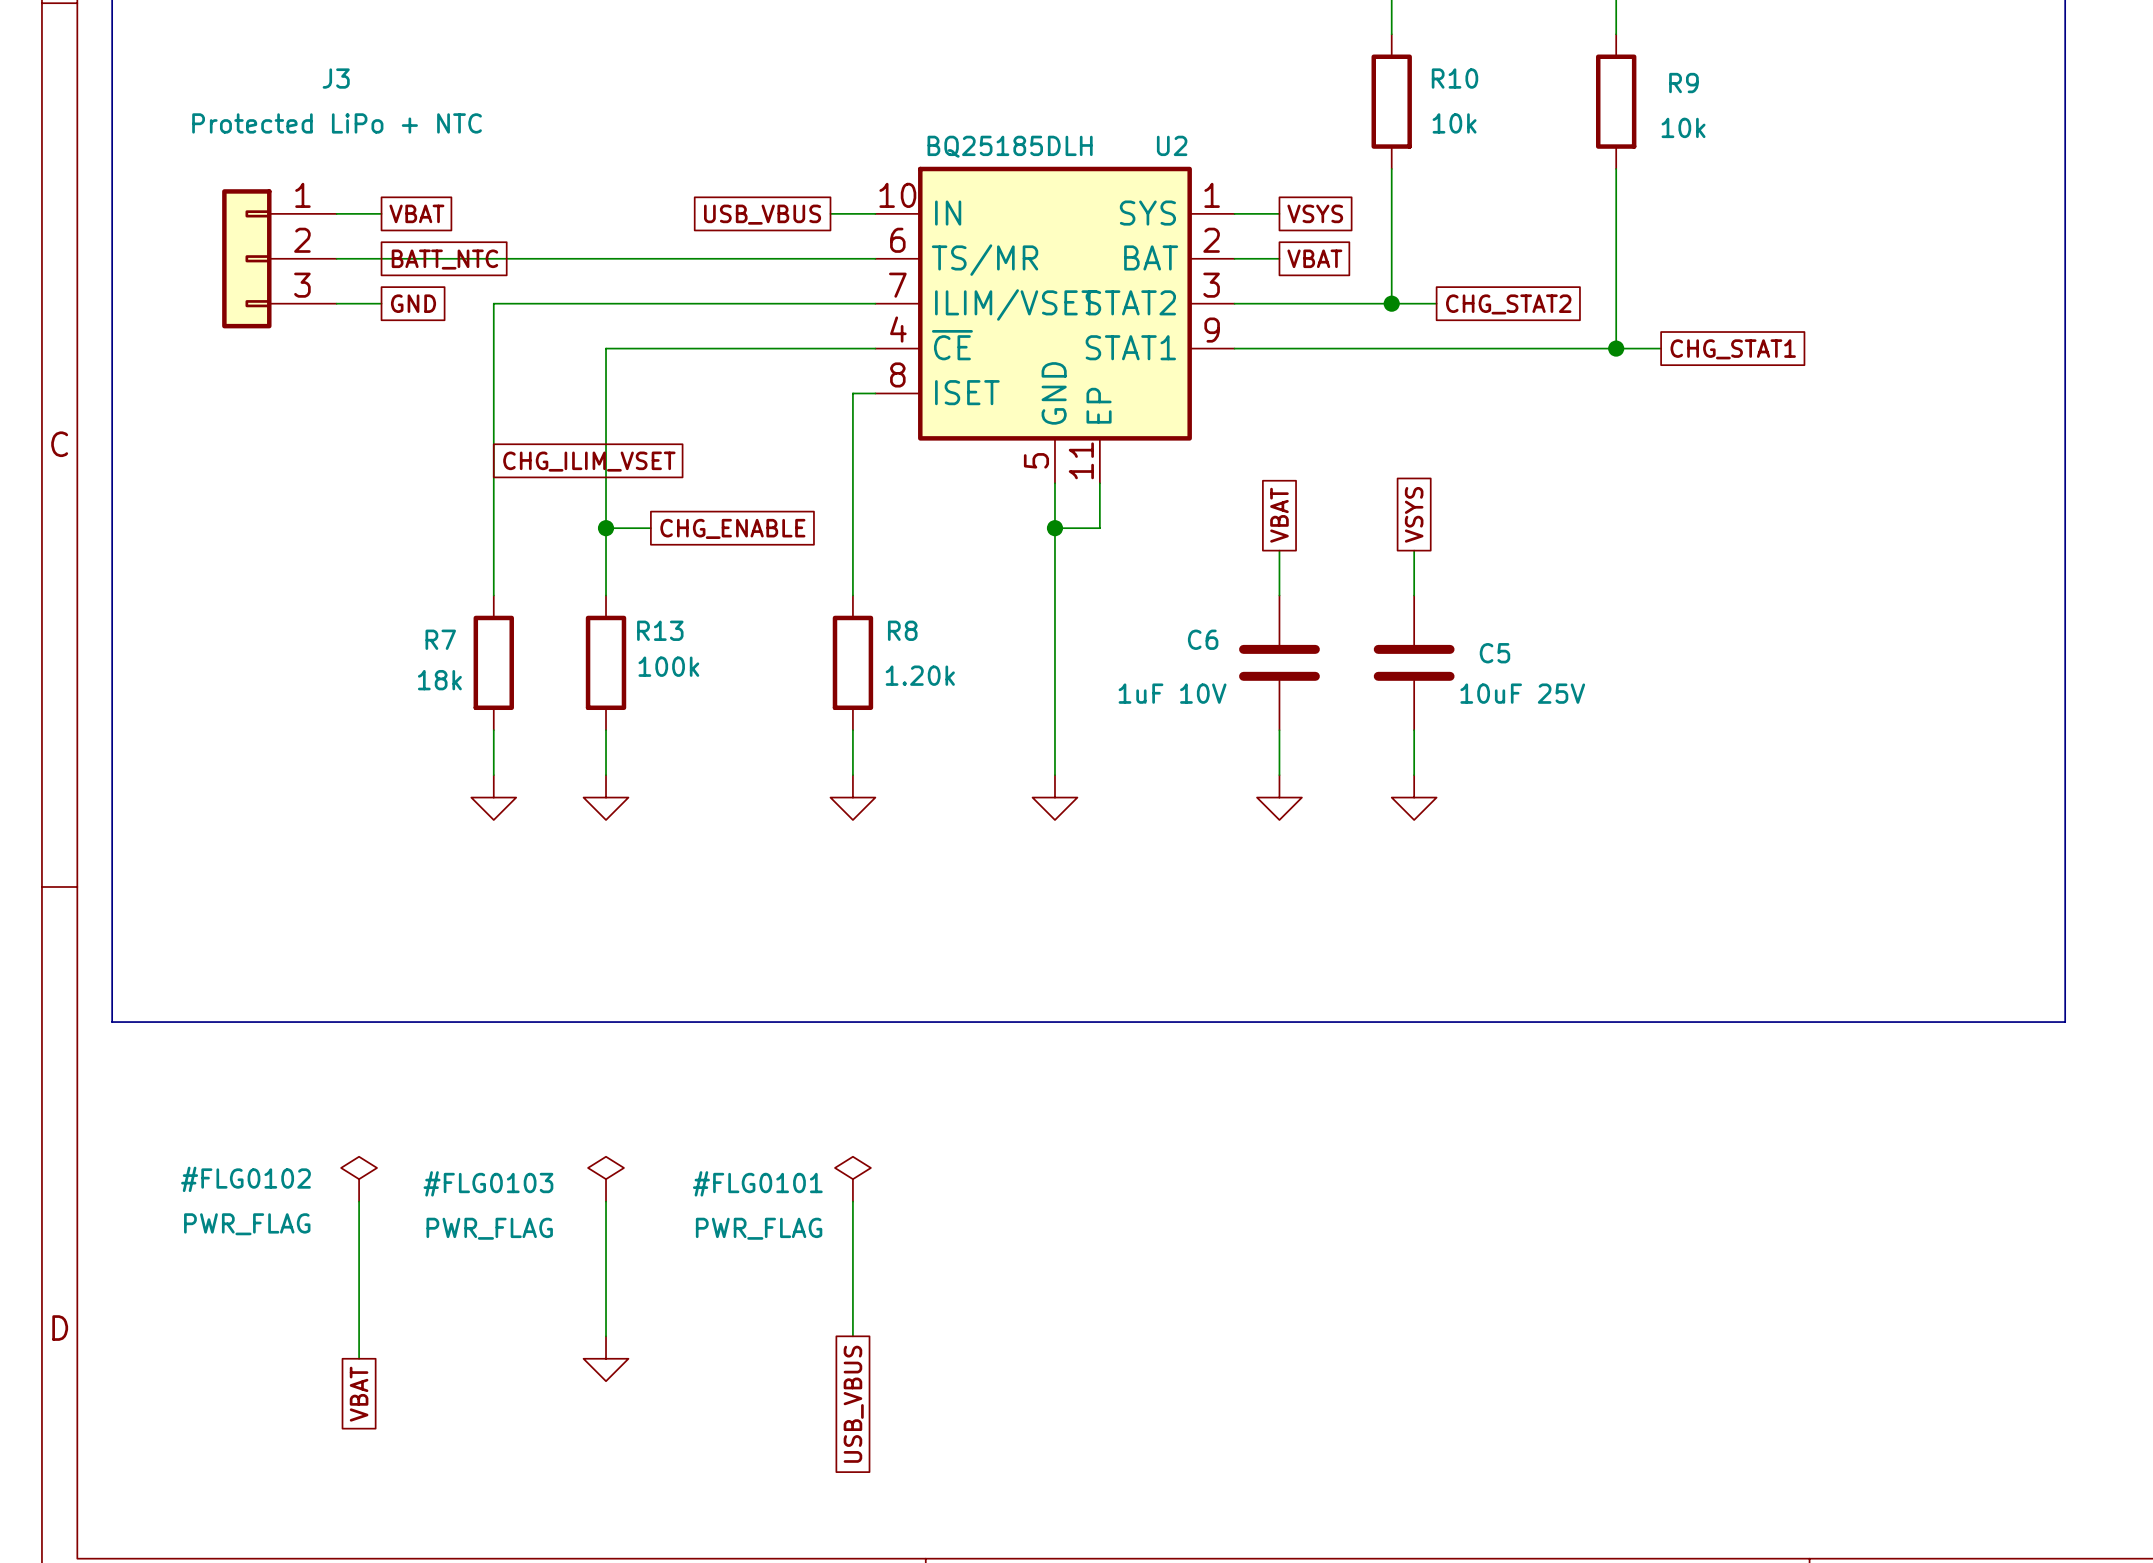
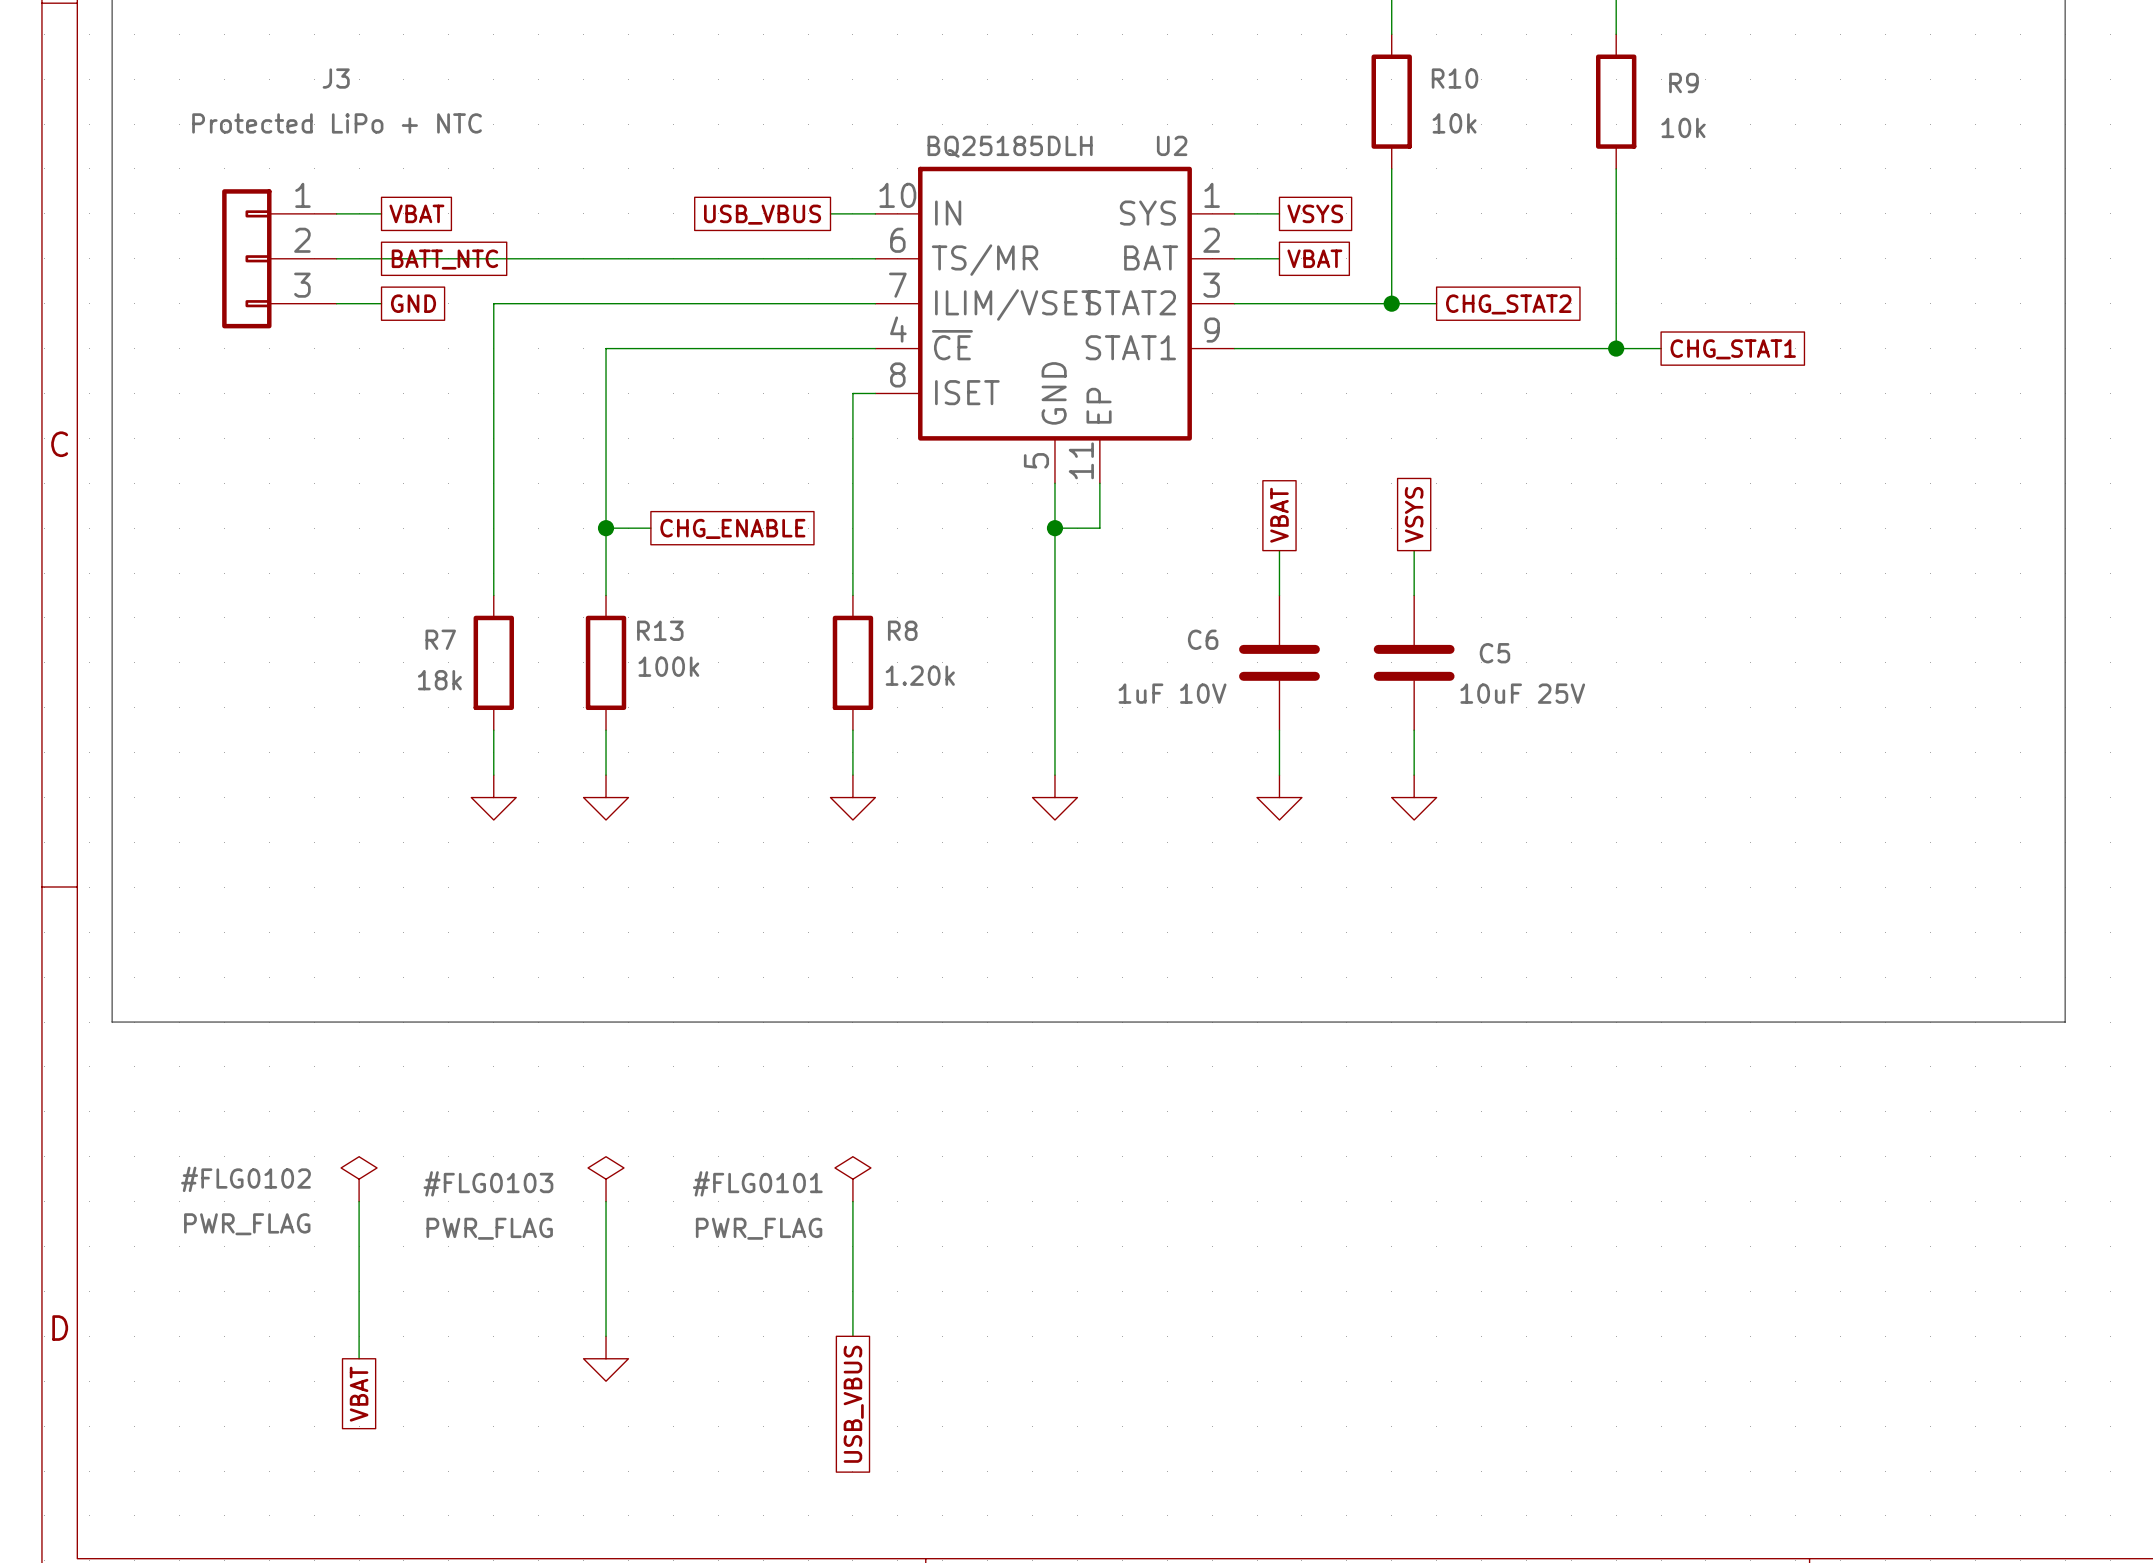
global label: CHG_ILIM_VSET (589, 461) -> none

